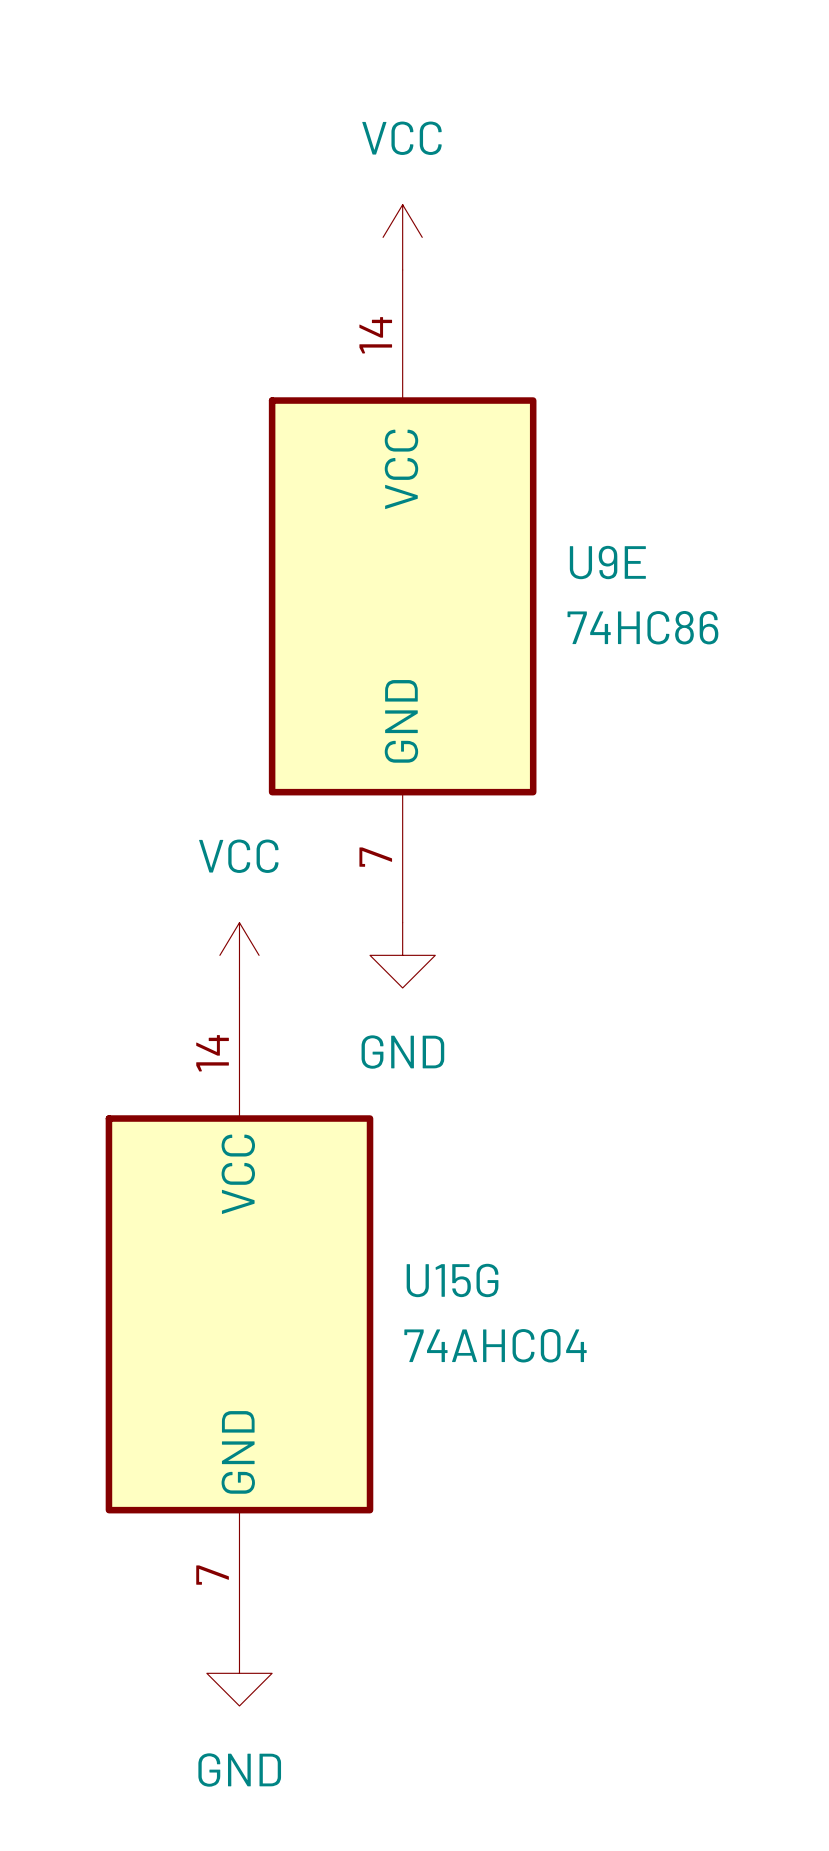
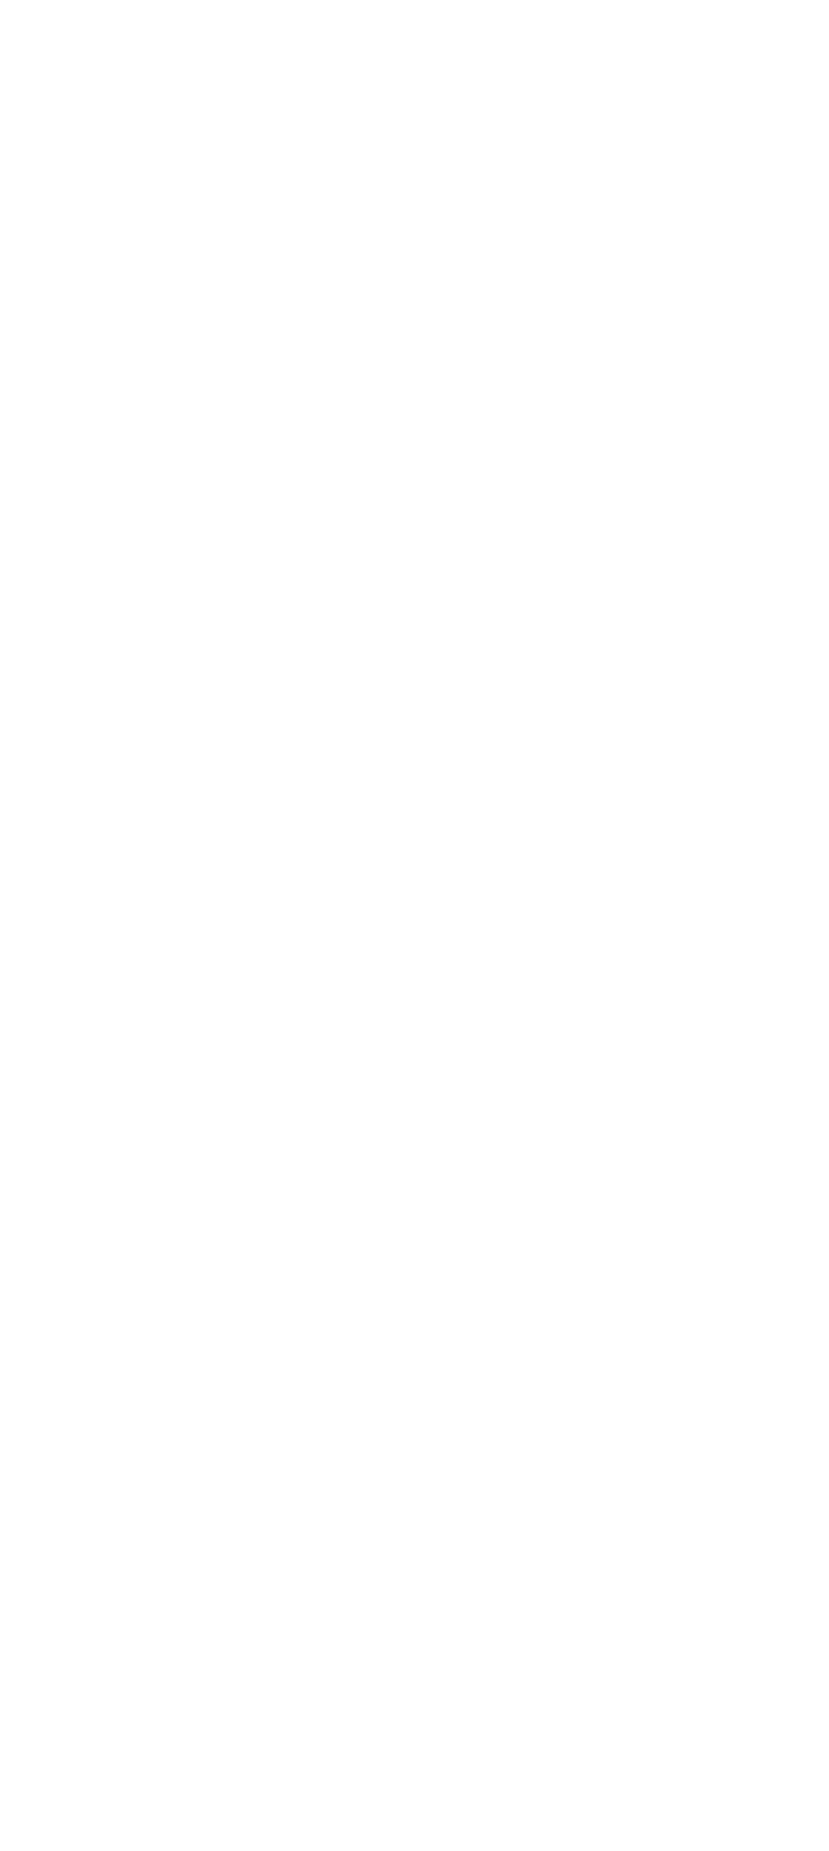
power symbol: VCC (402, 237) -> none
U9E: 74HC86 (402, 596) -> none
power symbol: VCC (239, 955) -> none
power symbol: GND (402, 955) -> none
U15G: 74AHC04 (239, 1314) -> none
power symbol: GND (239, 1673) -> none

